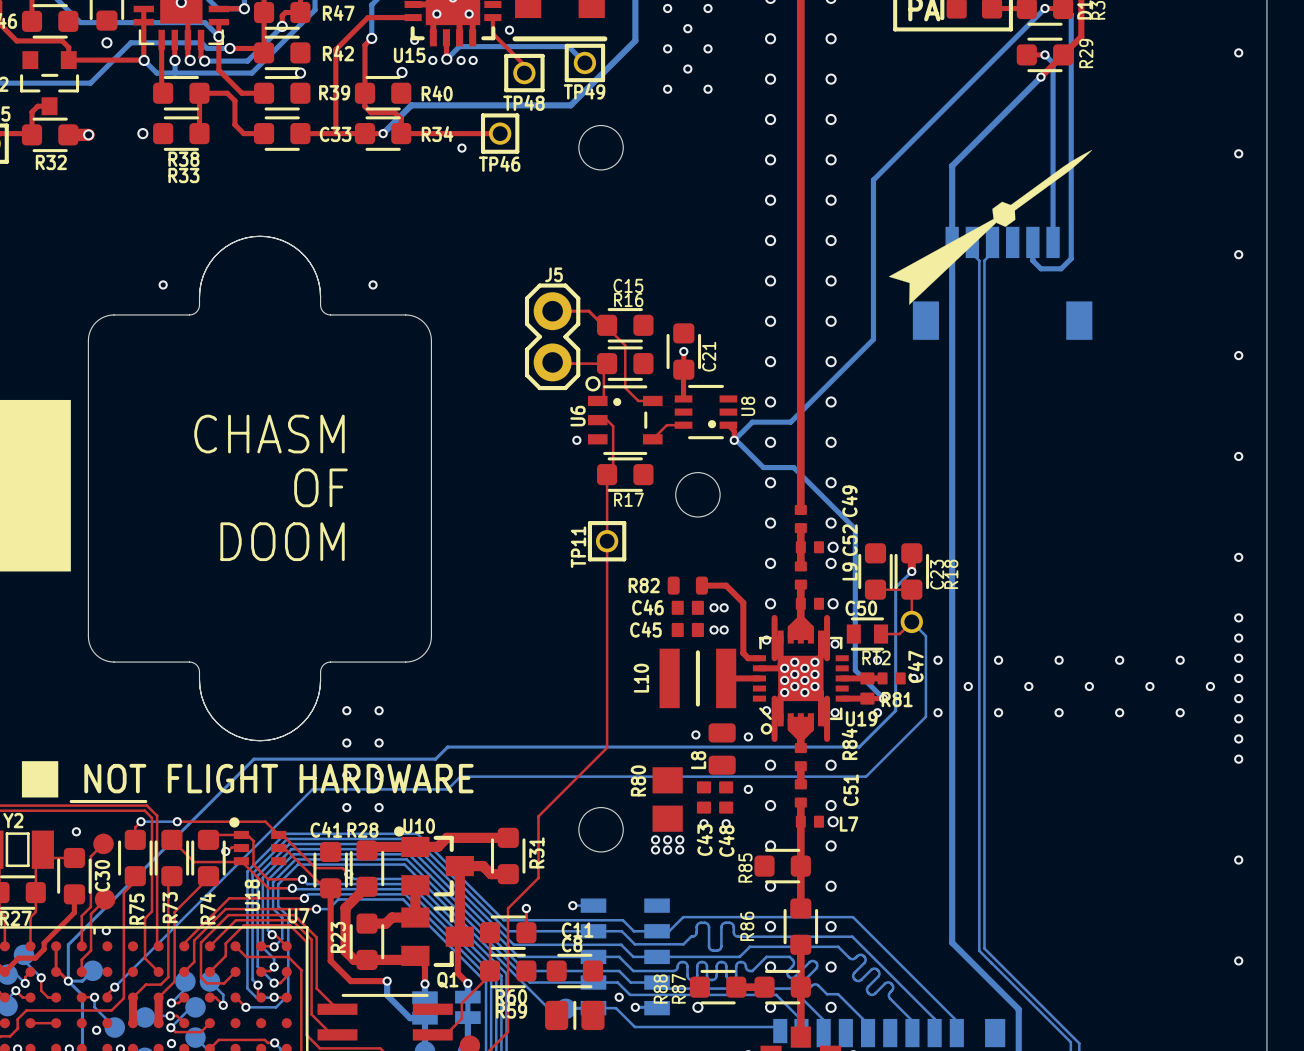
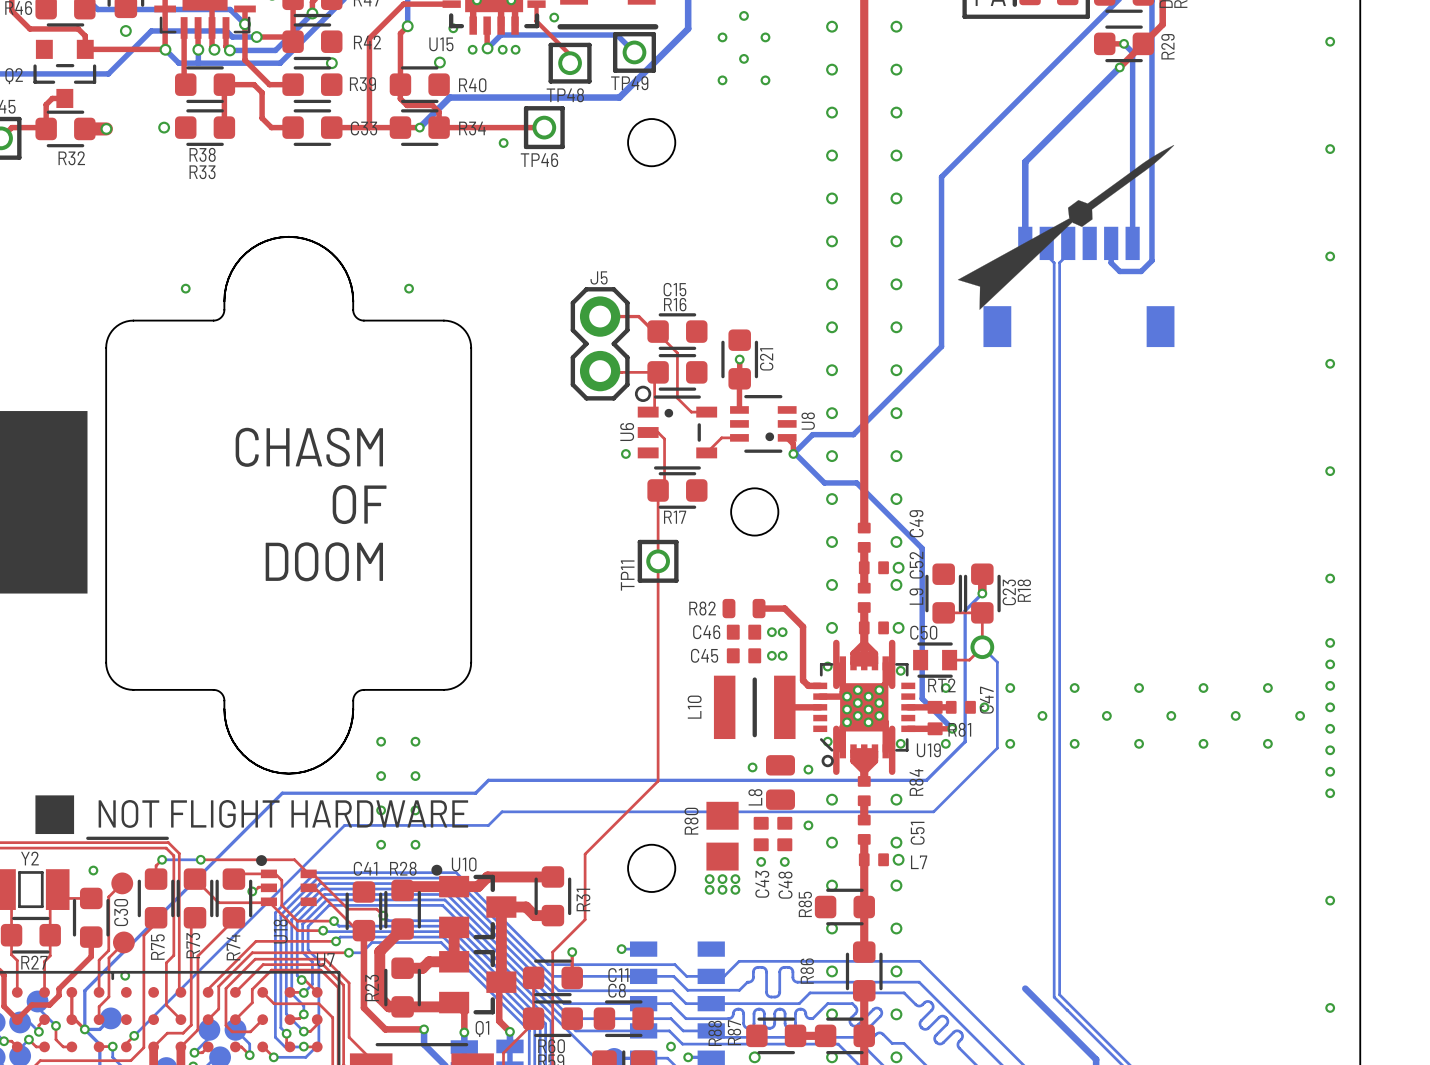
bottom track: (952, 242) (952, 942) -> none

